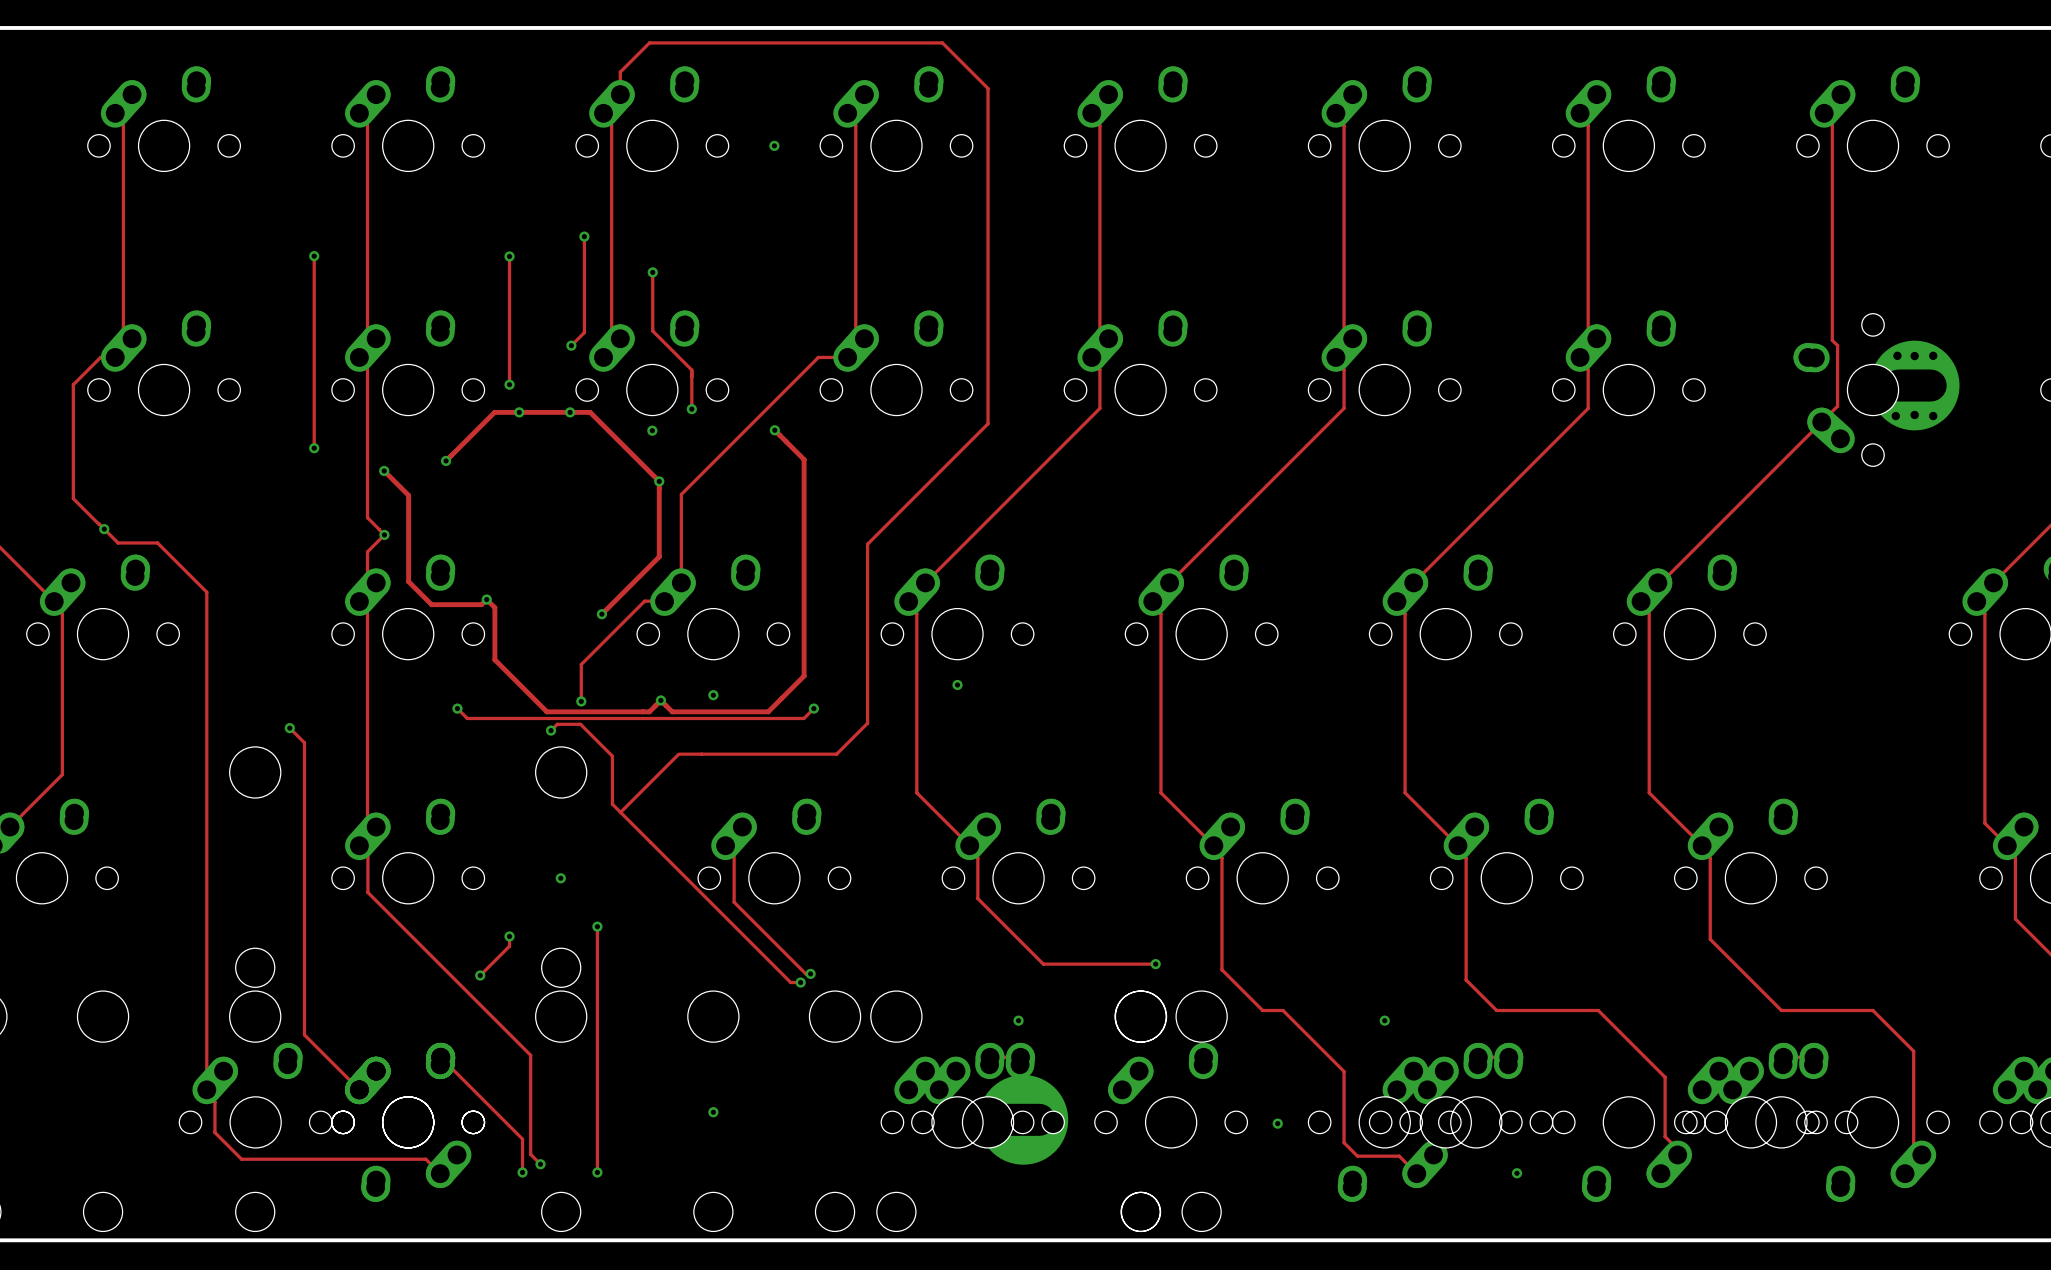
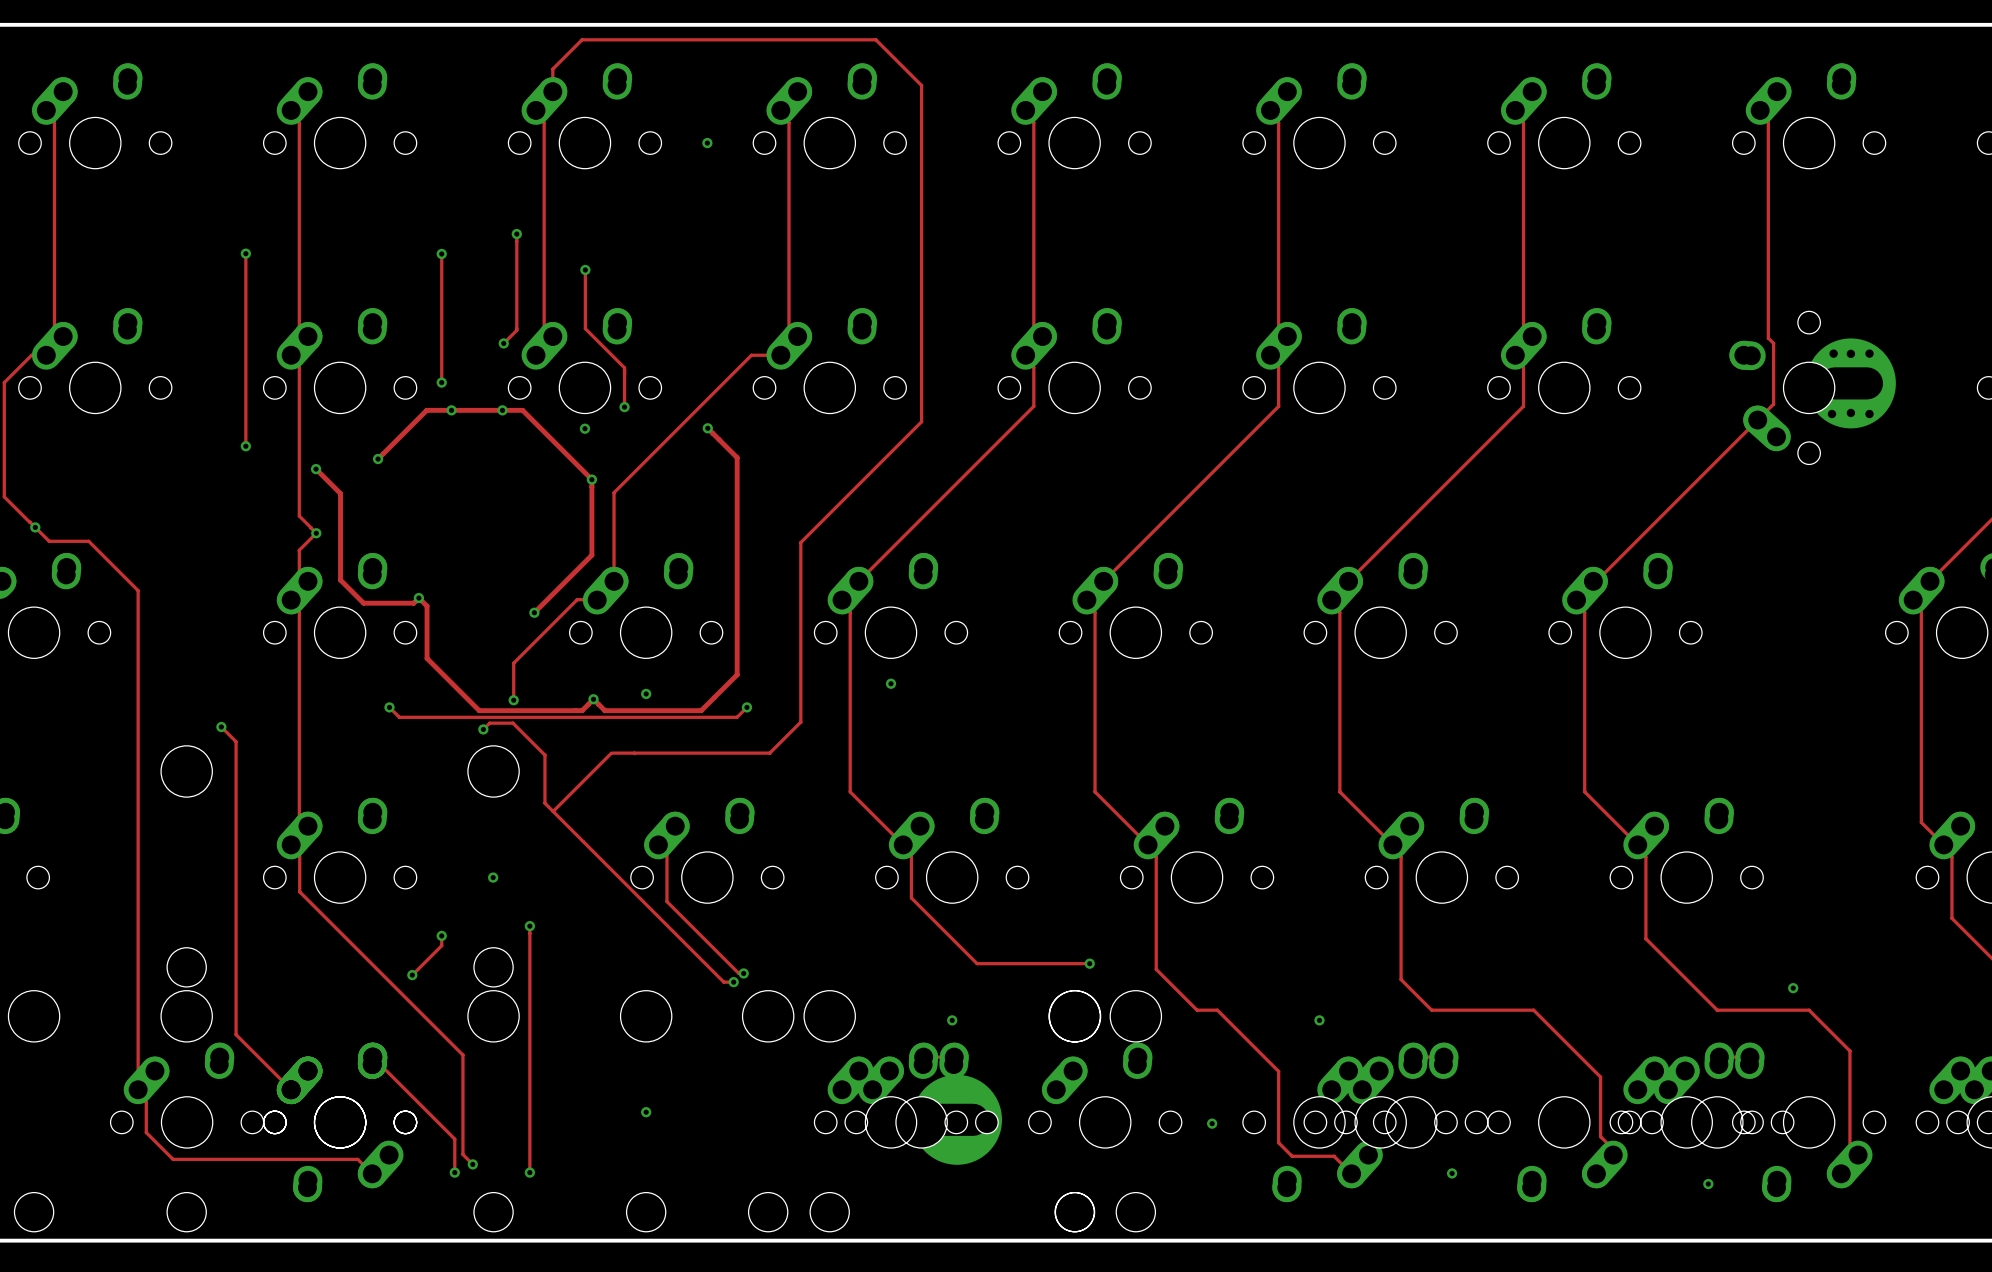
via: none -> (1793, 988)
via: none -> (1708, 1184)

